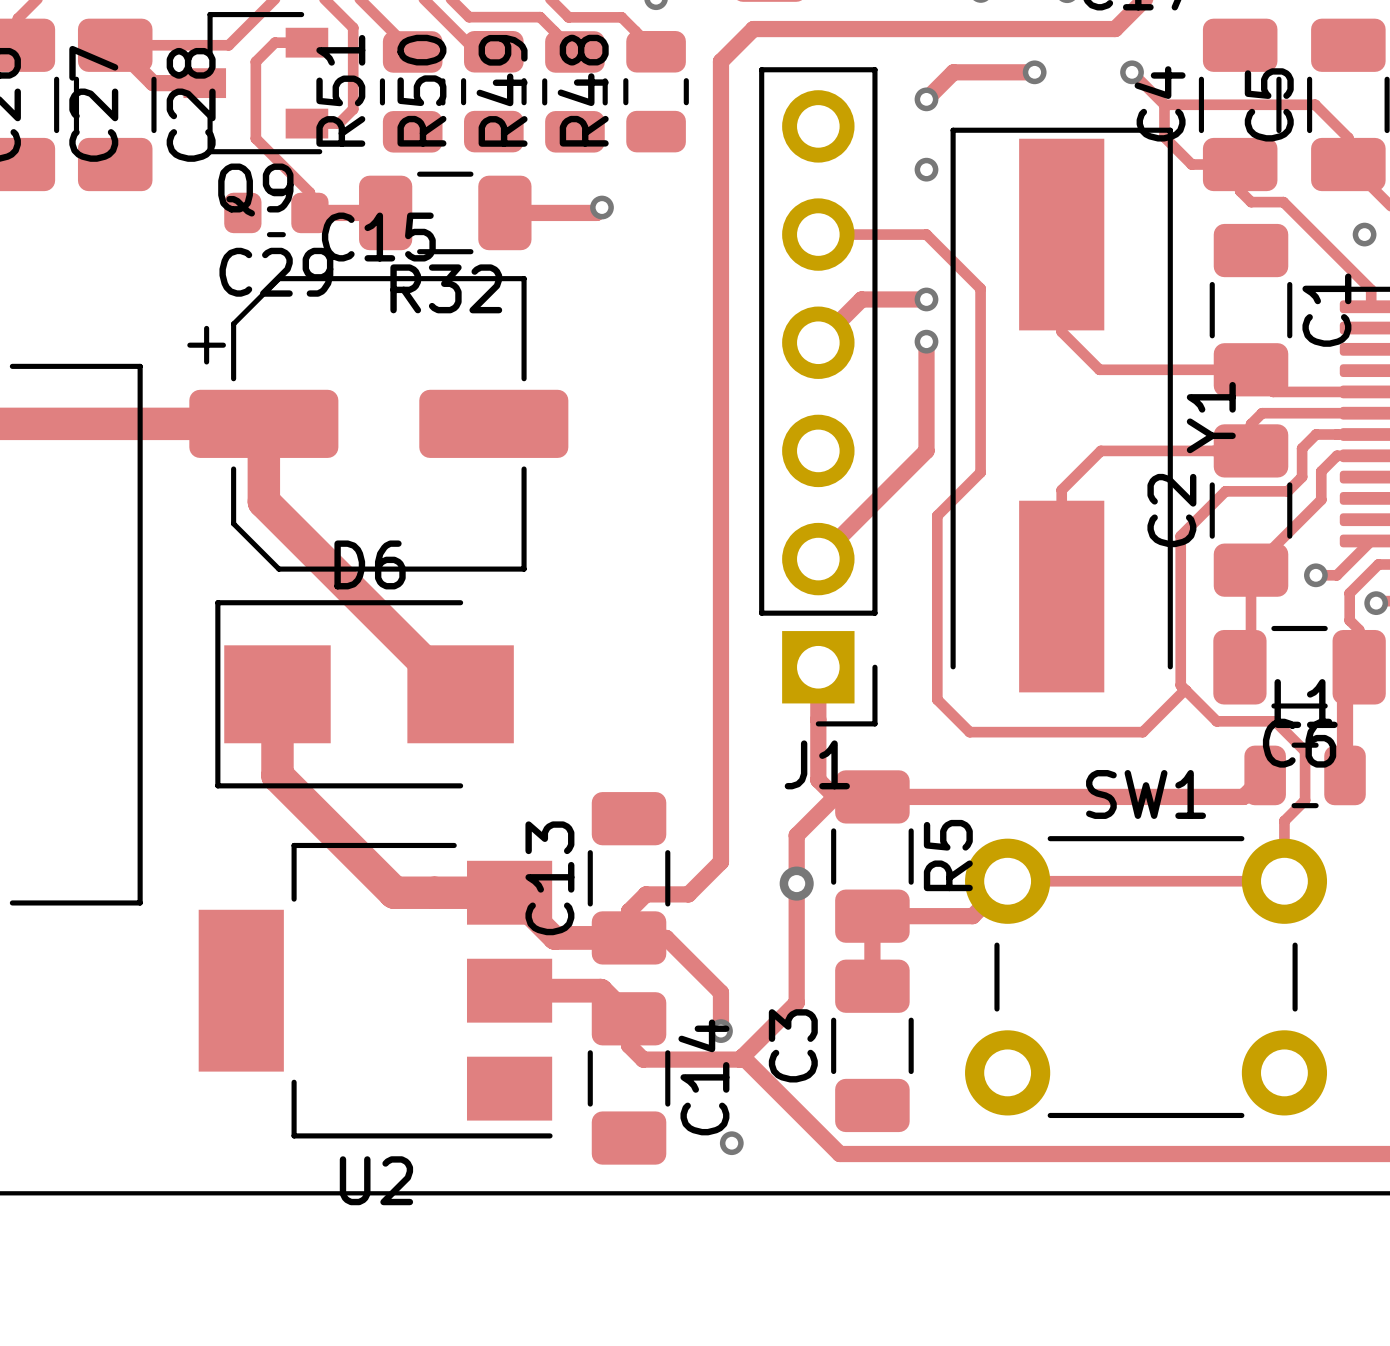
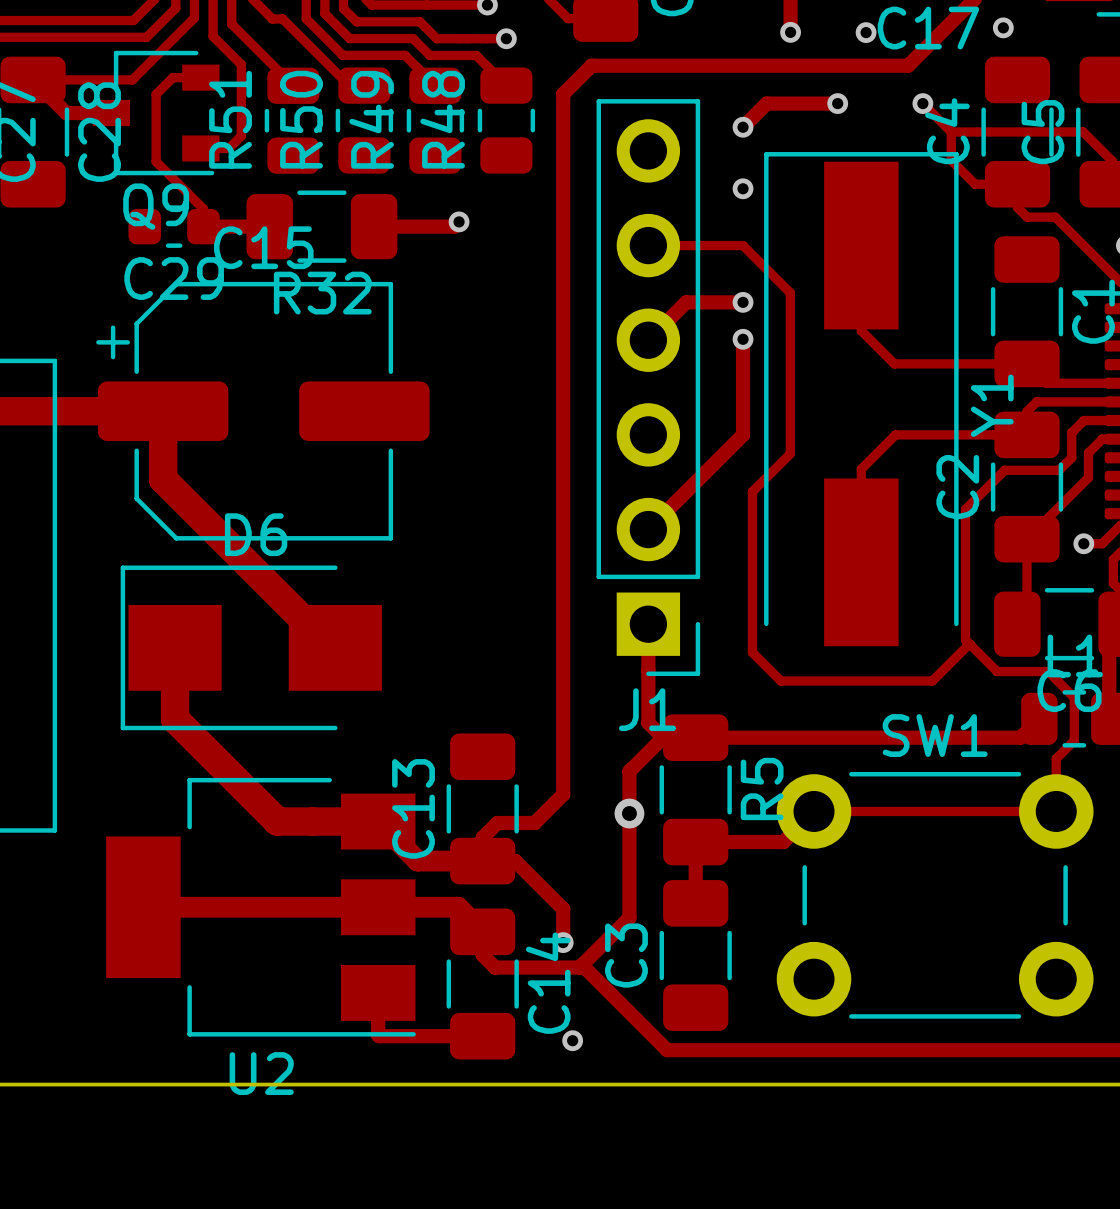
track: none -> (143, 907) (378, 907)
track: none -> (378, 992) (379, 1036) (482, 1036)

